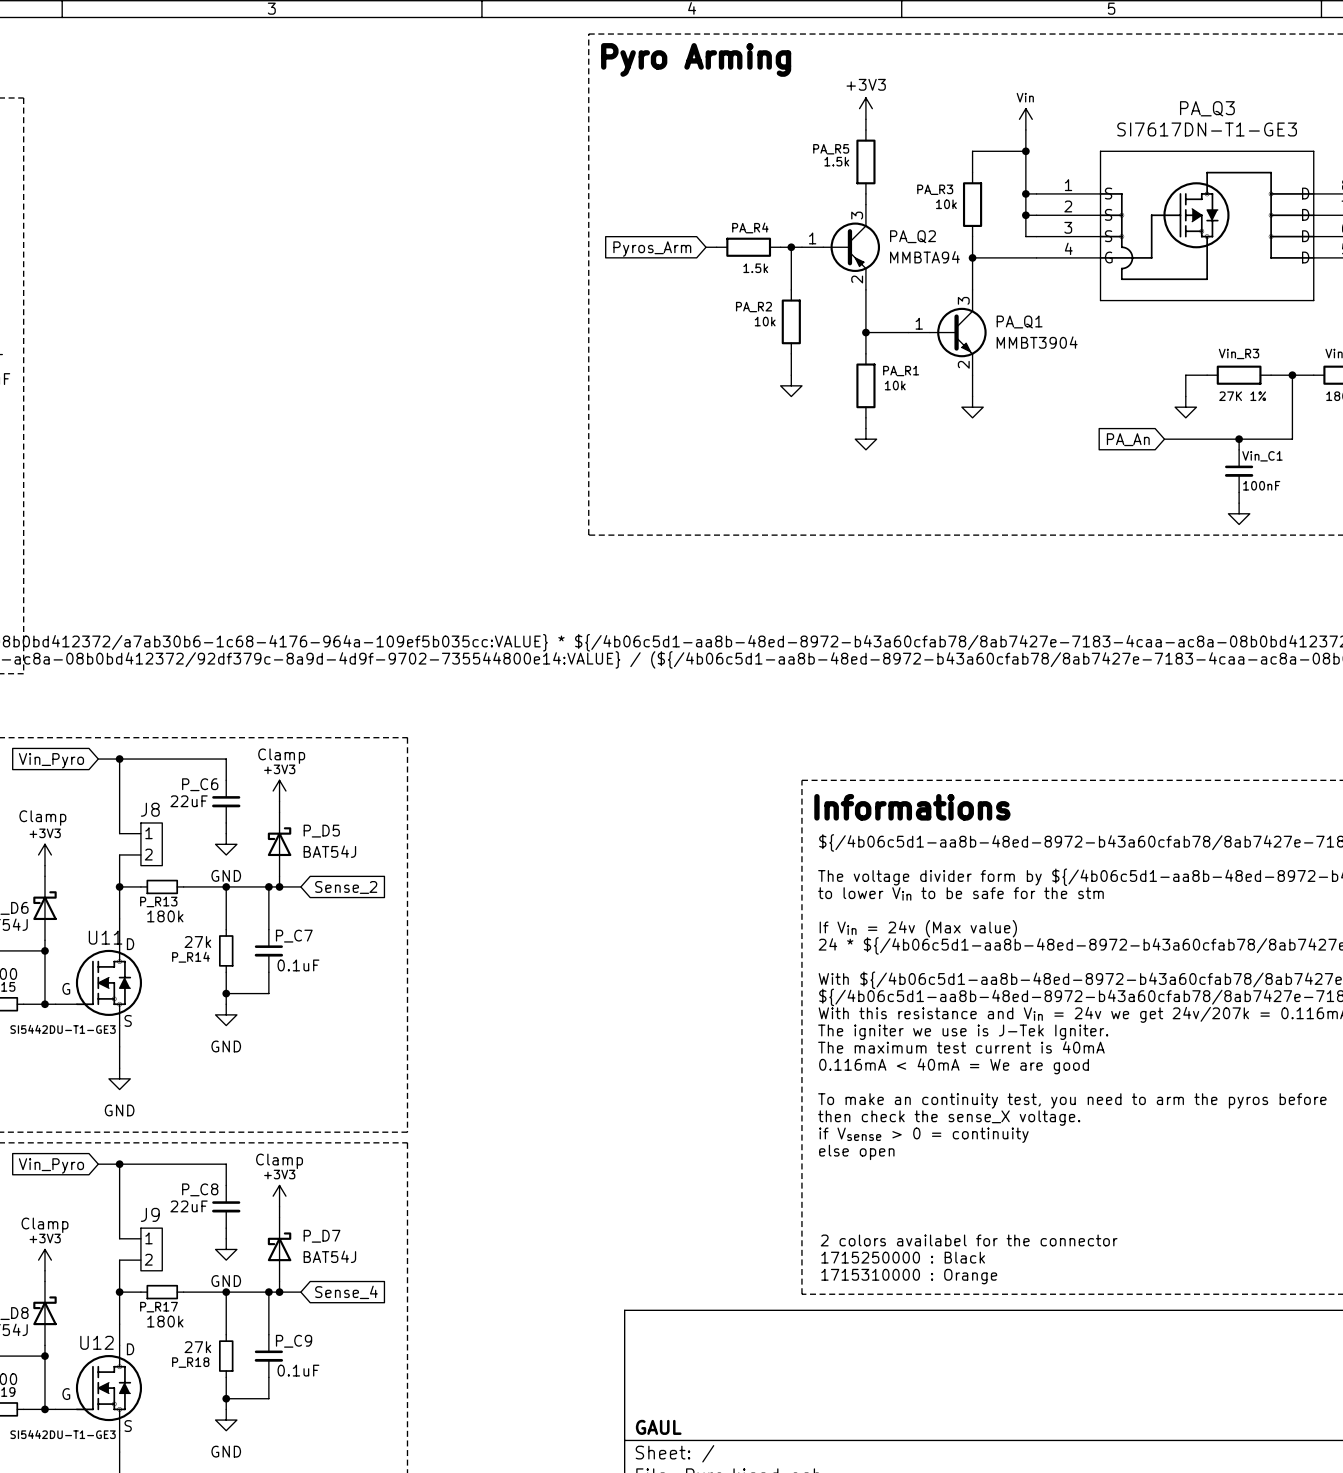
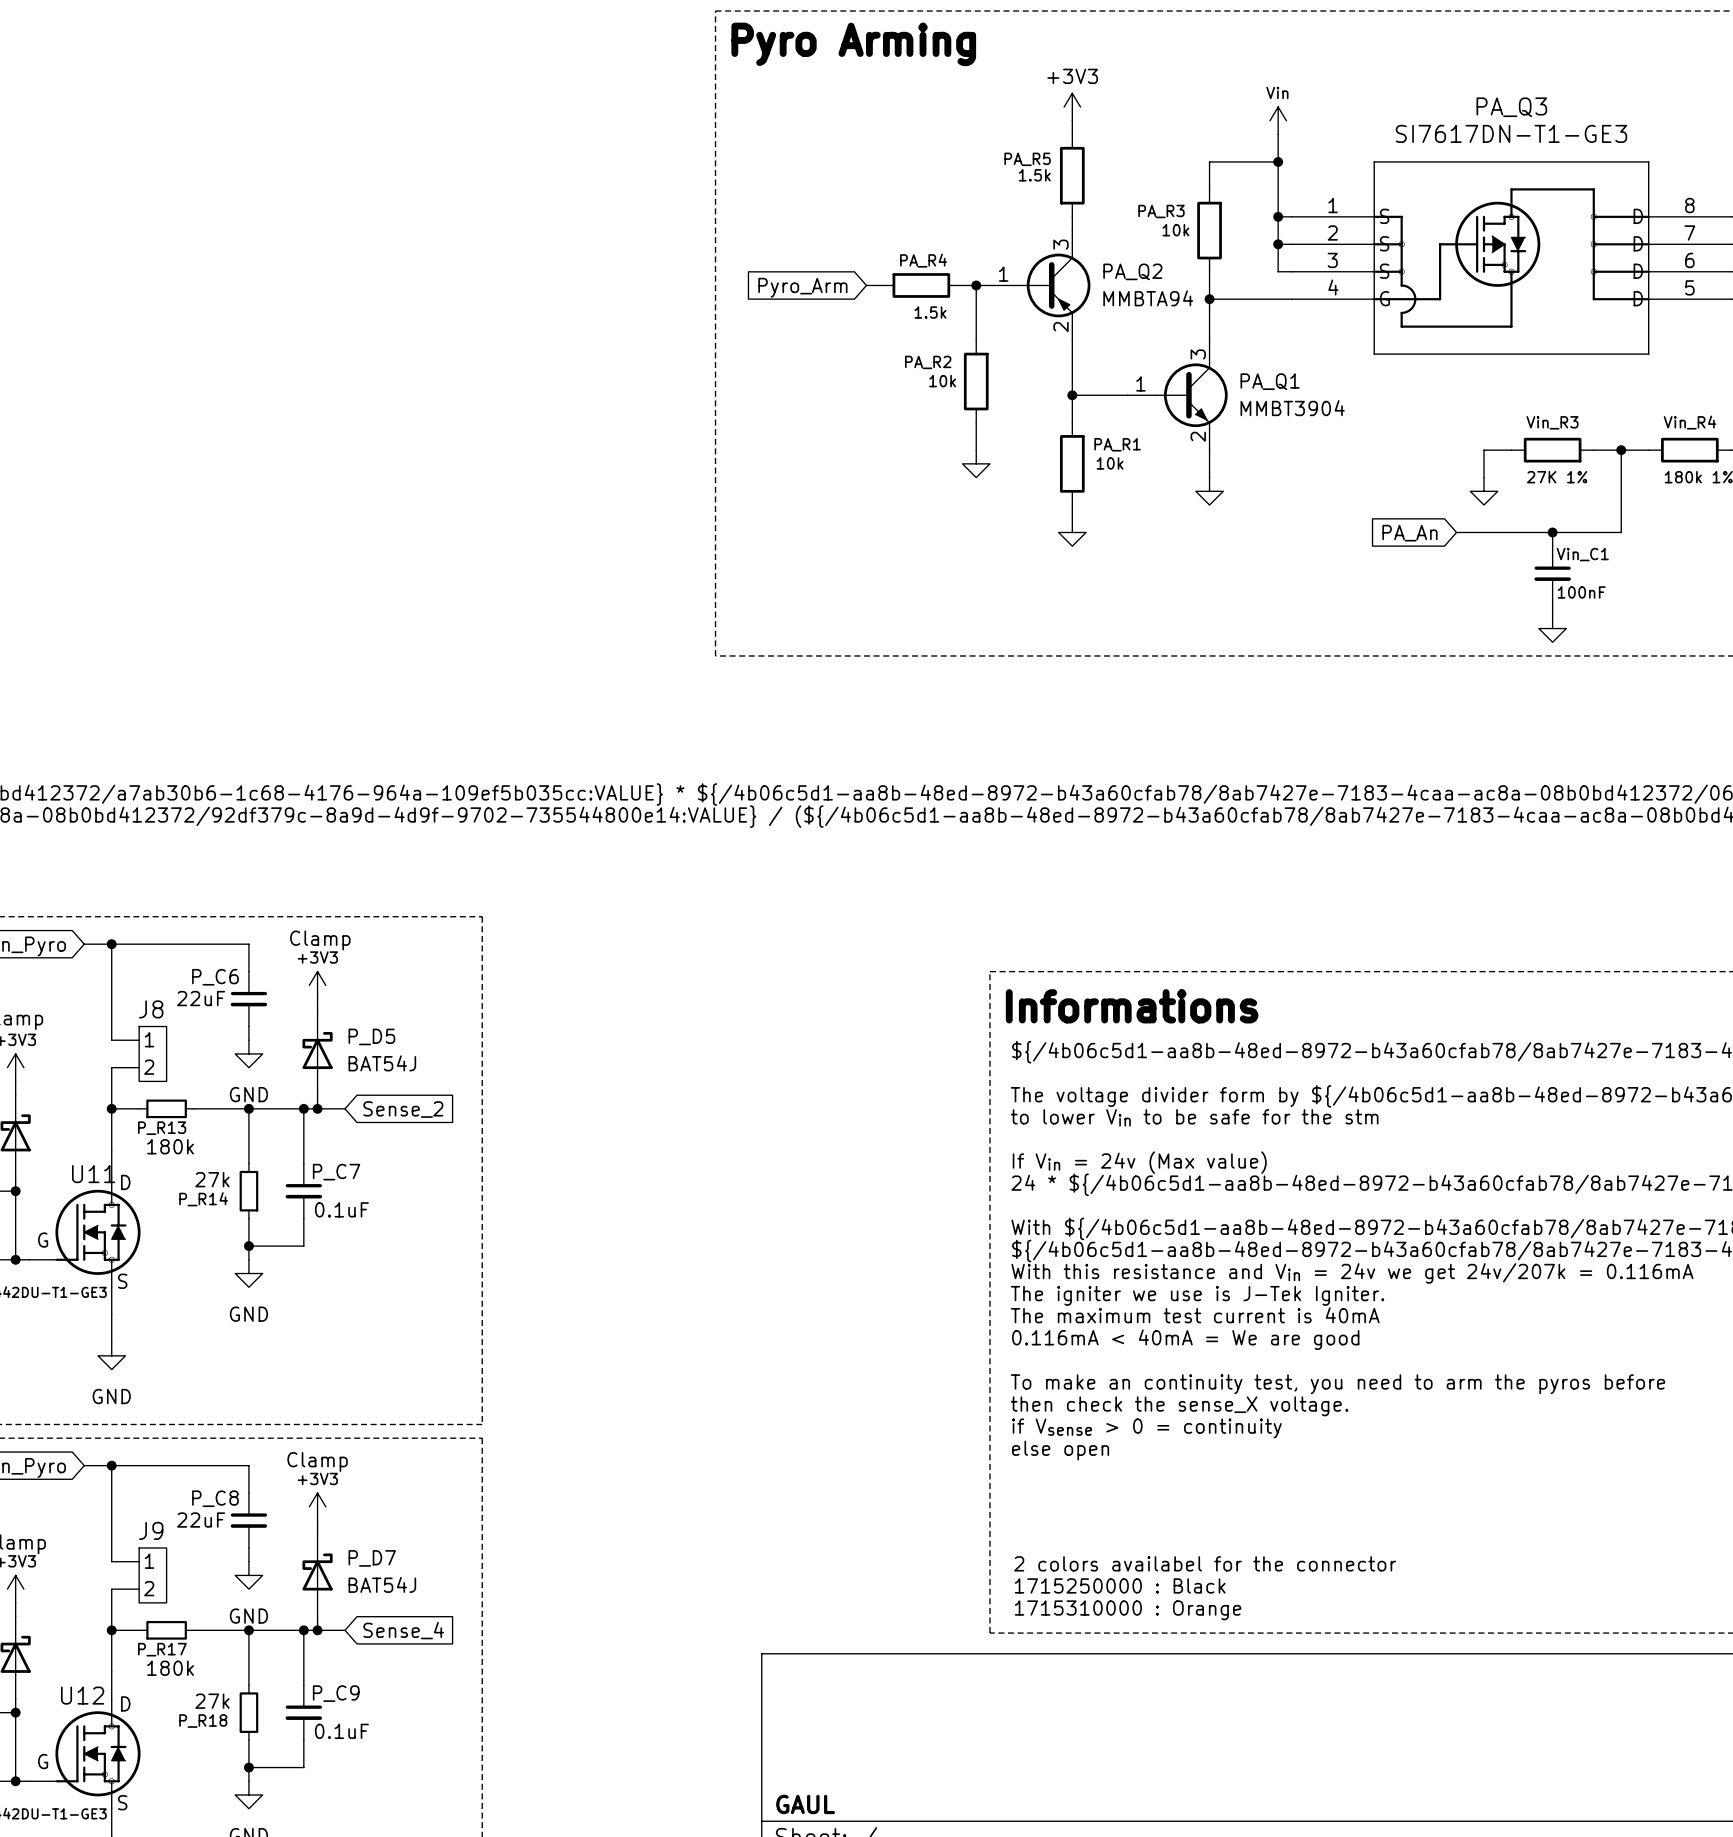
global label: Pyros_Arm (652, 249) -> Pyro_Arm (802, 287)

